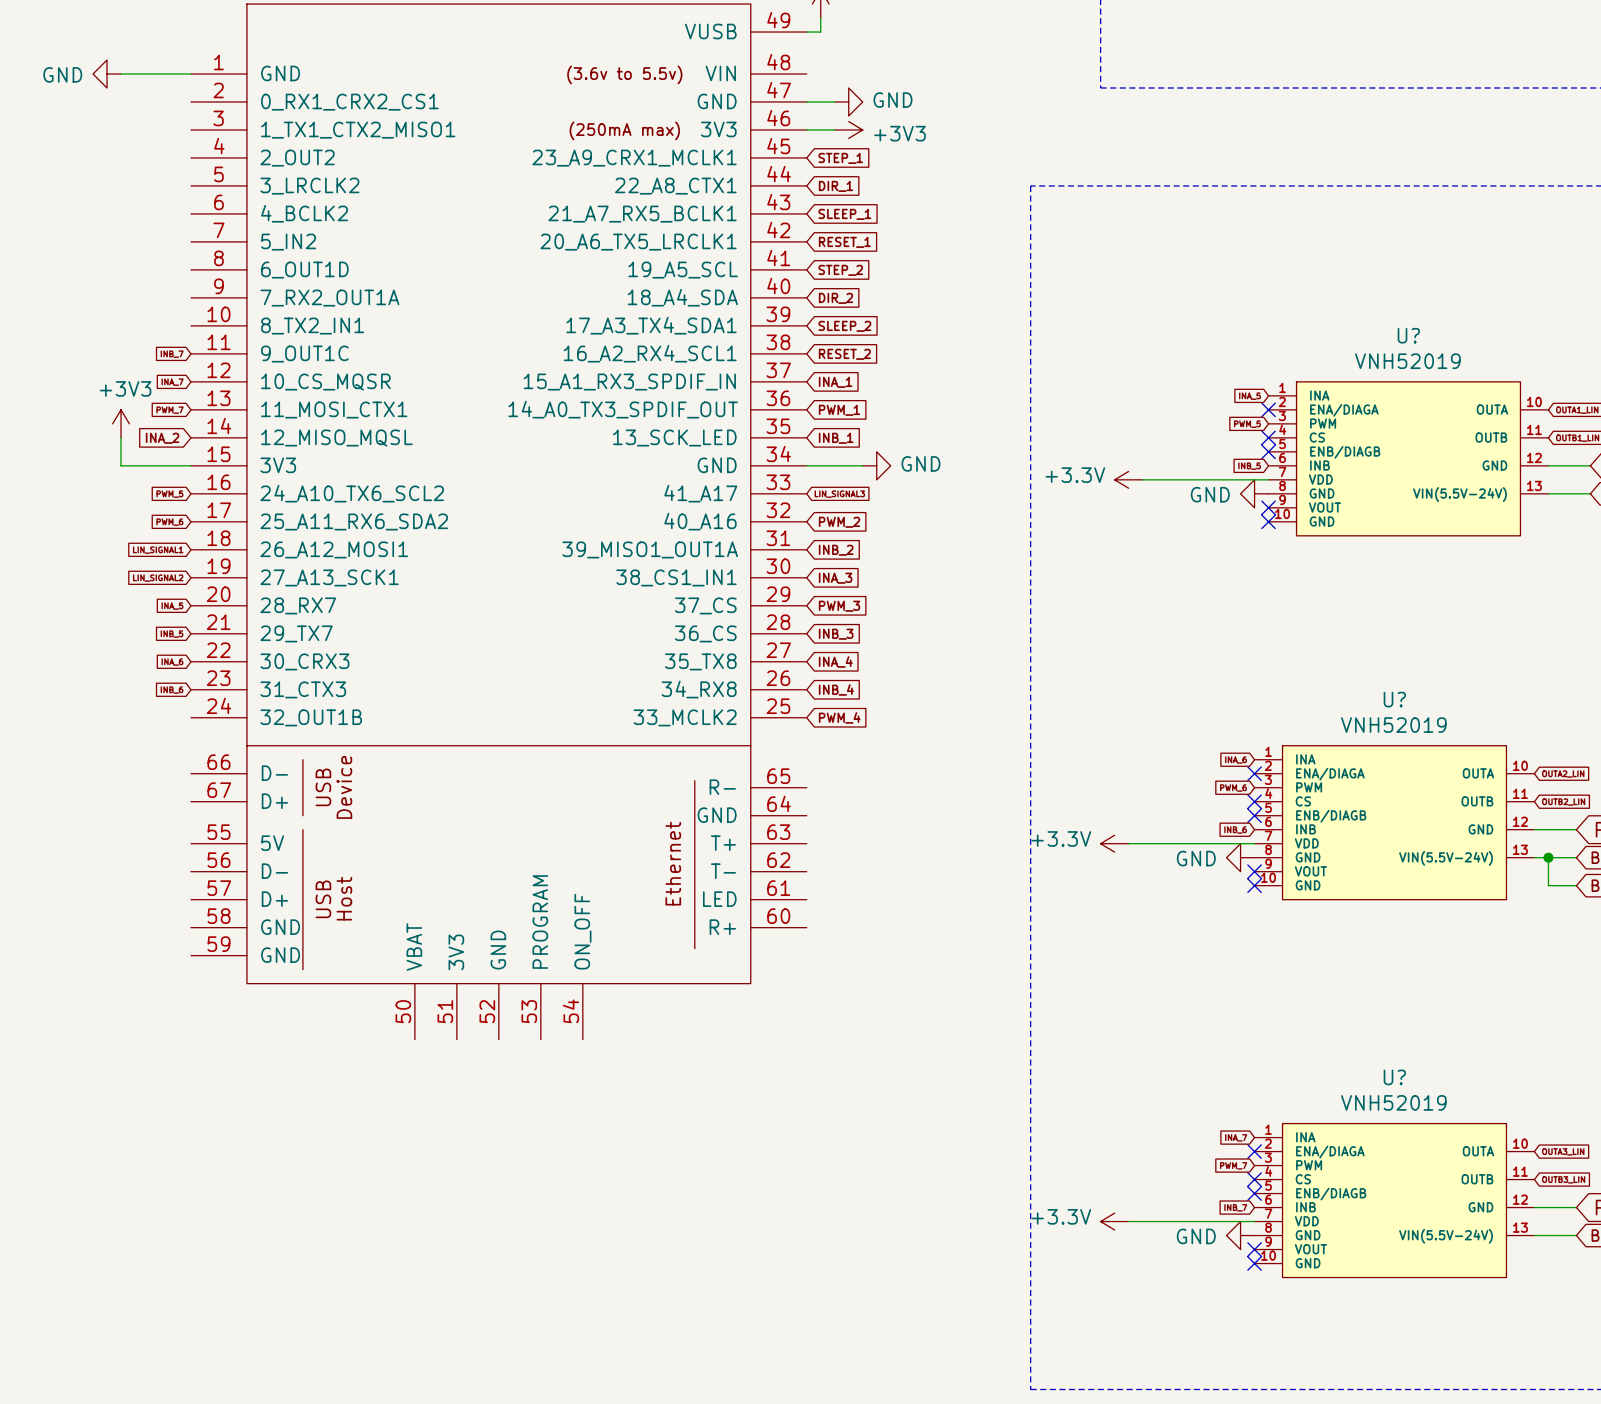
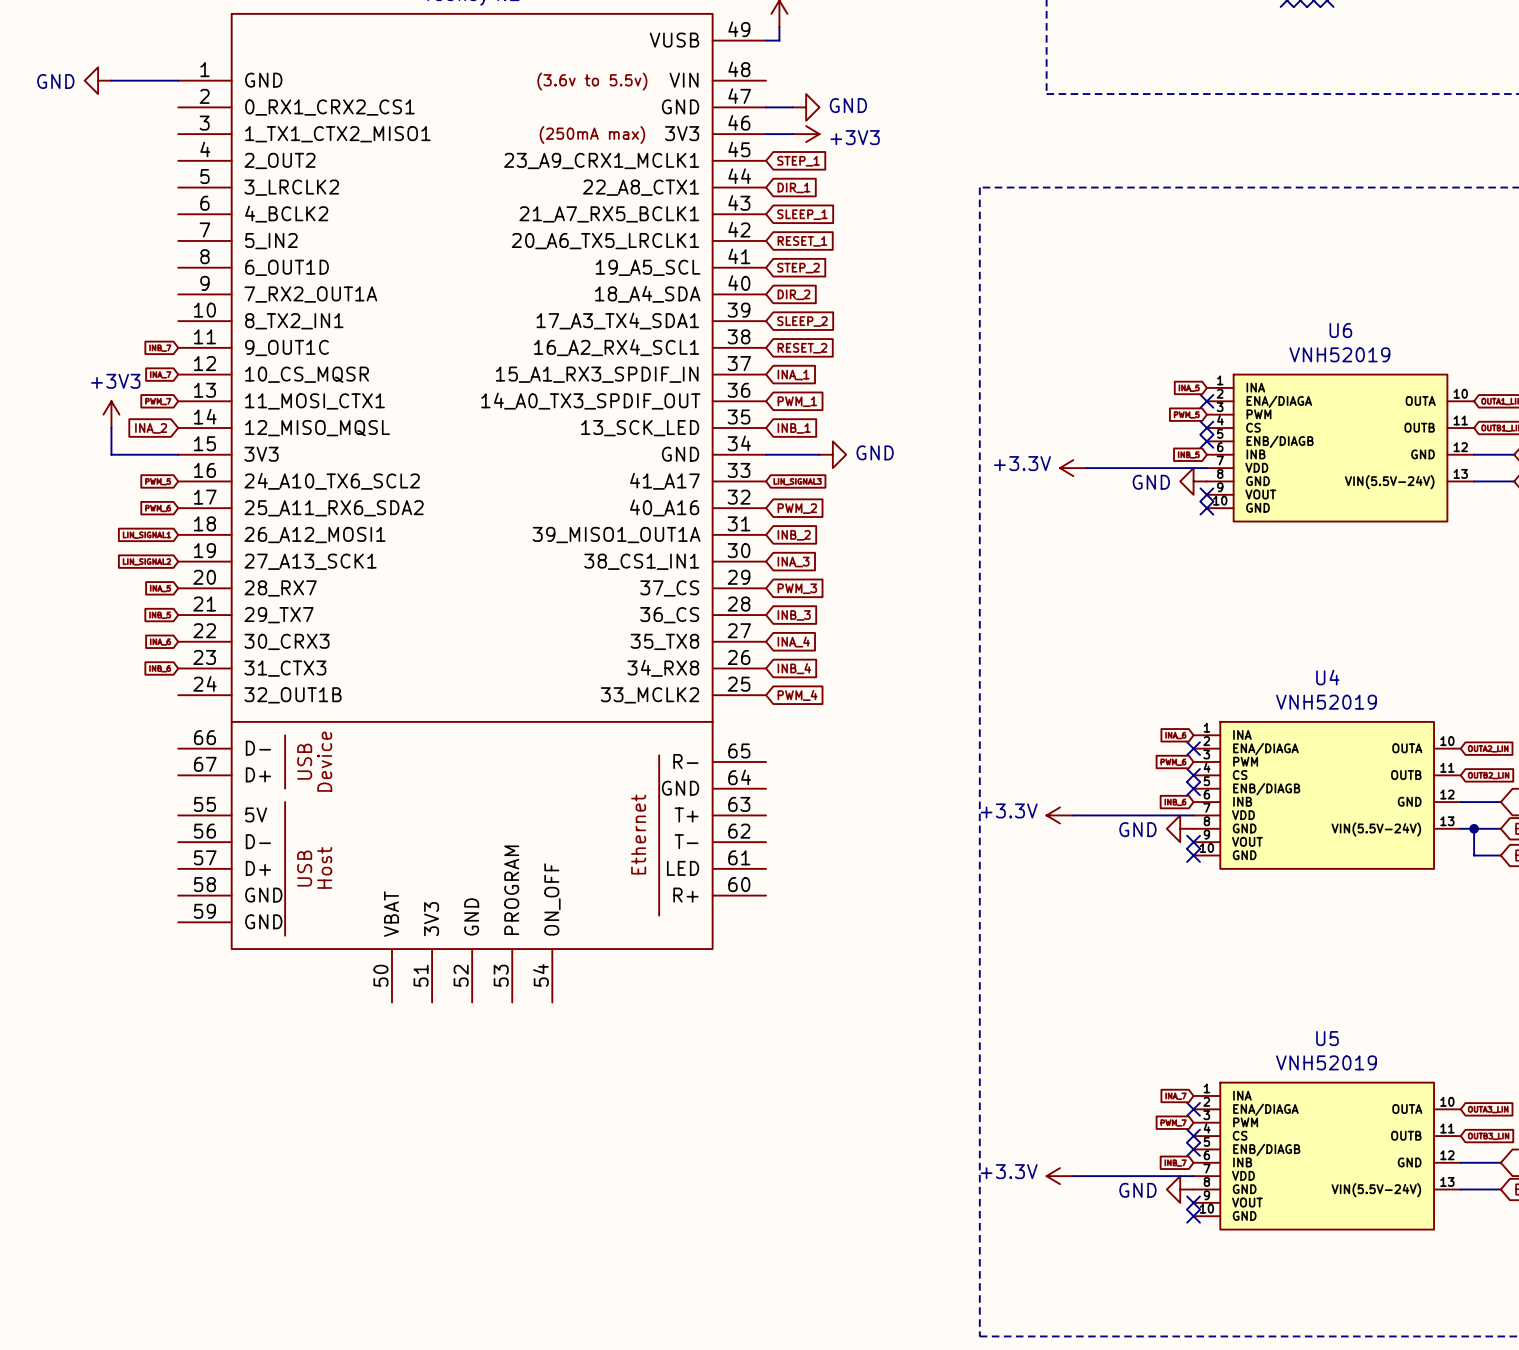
U? name: U? (1408, 335) -> U6 (1340, 330)
U? name: U? (1394, 699) -> U4 (1327, 677)
U? name: U? (1394, 1077) -> U5 (1327, 1038)

